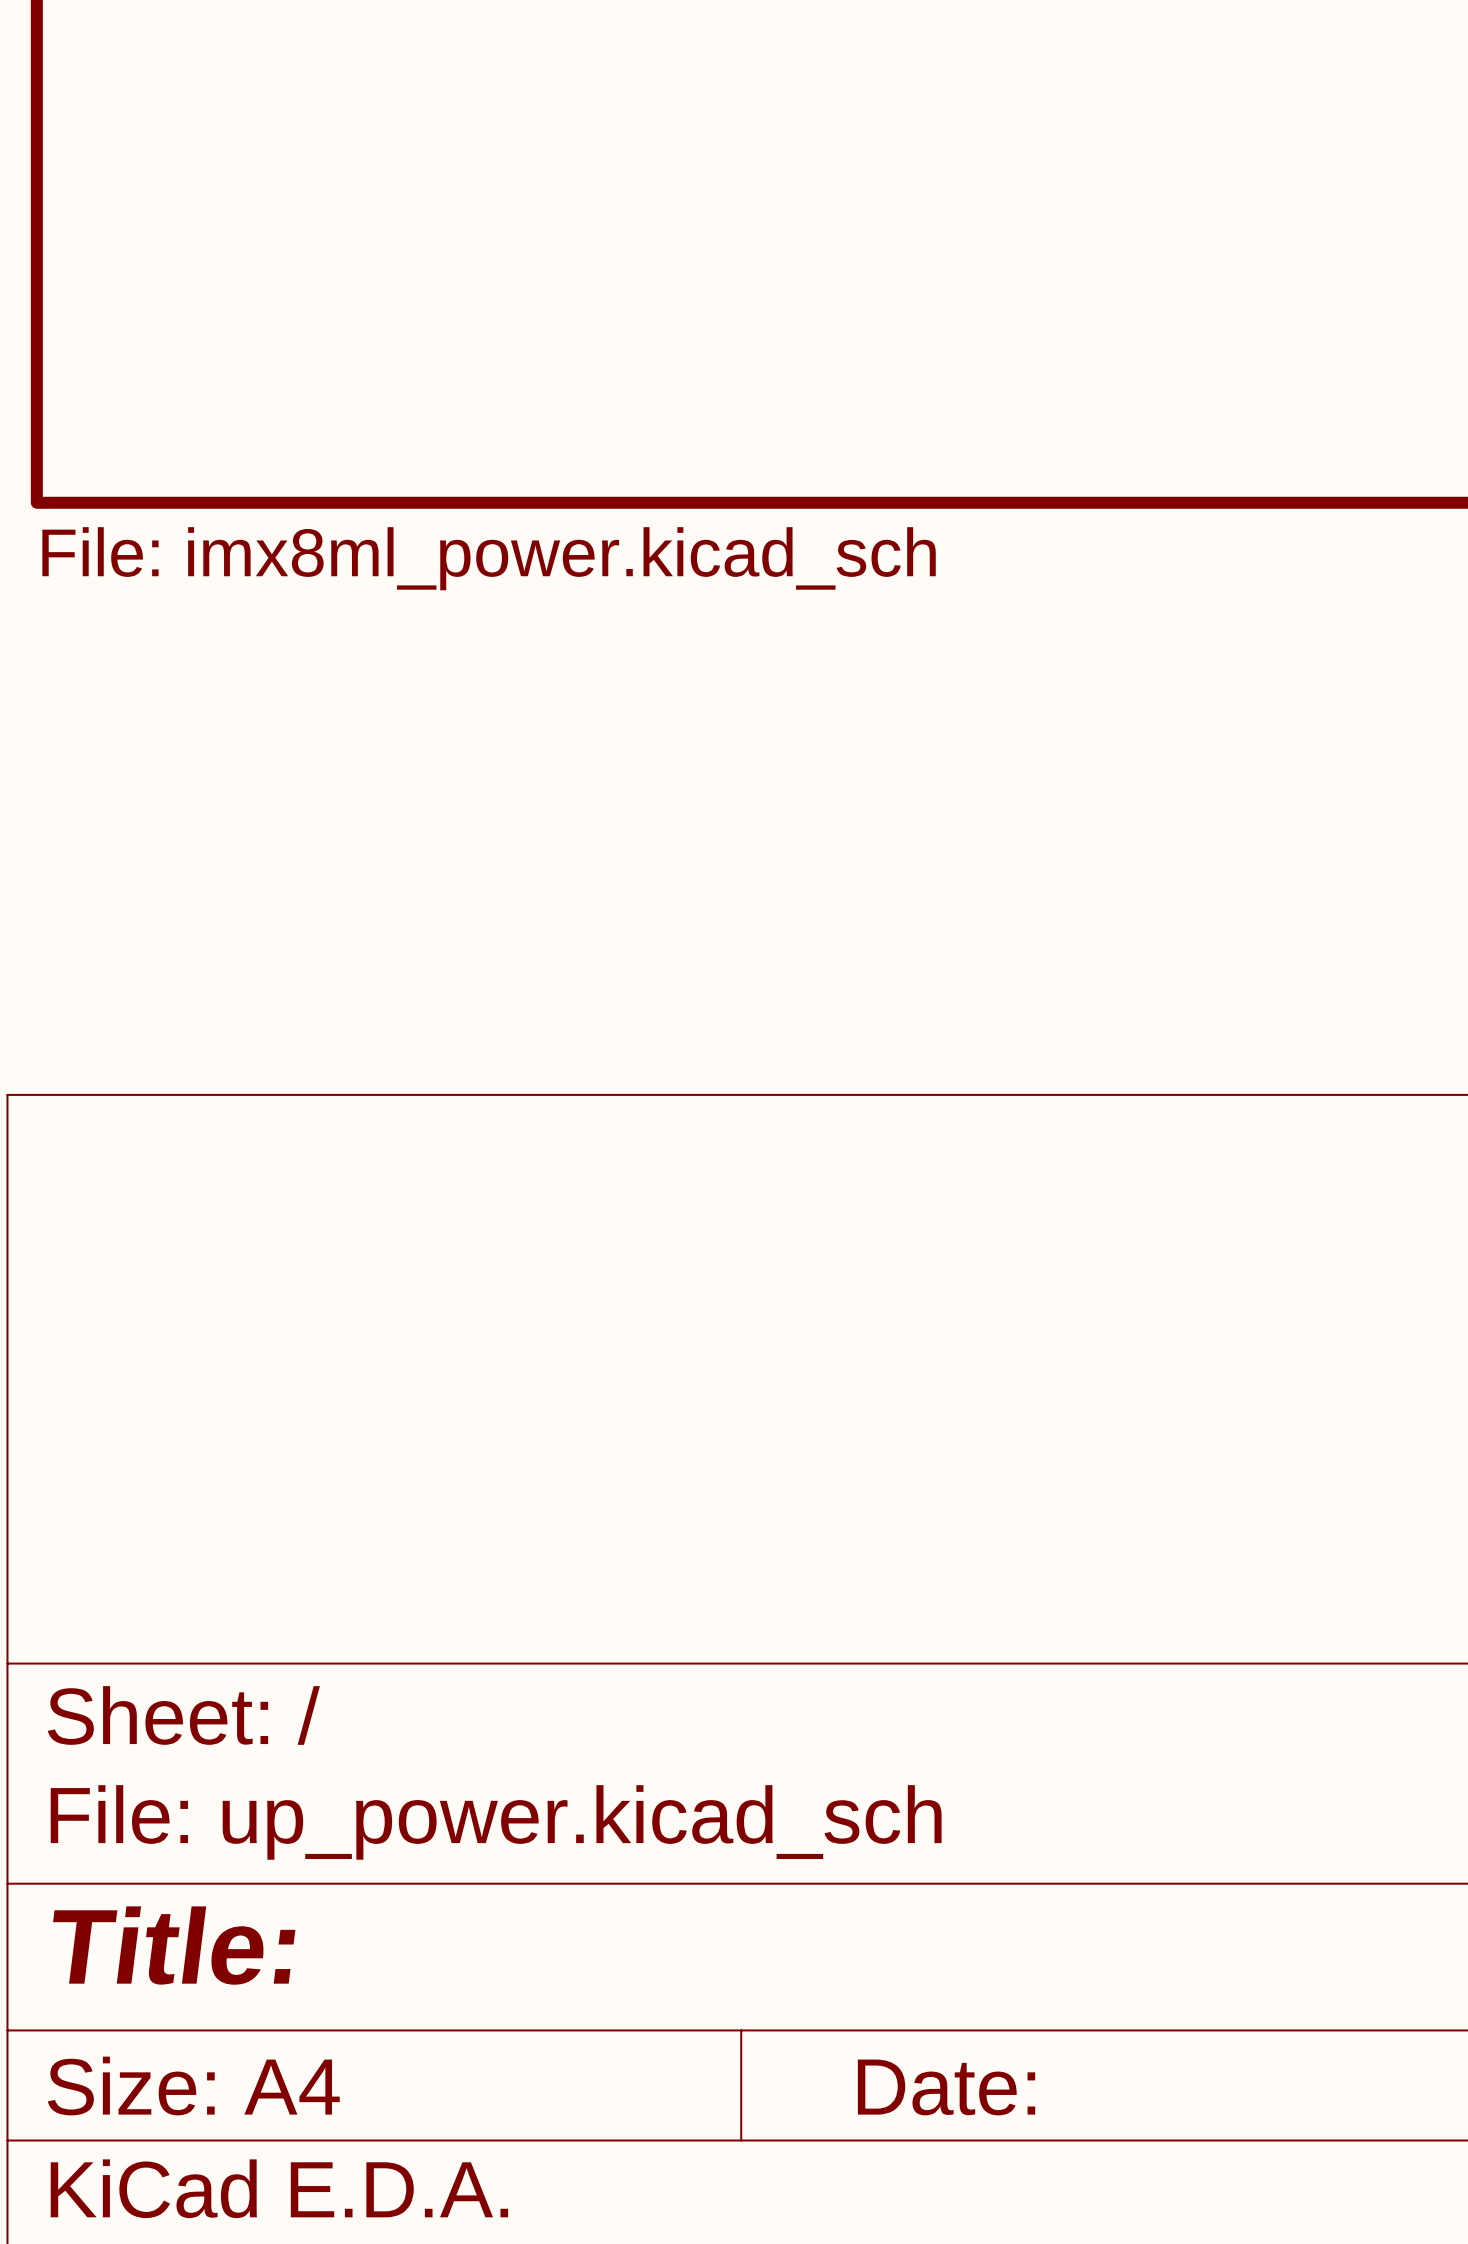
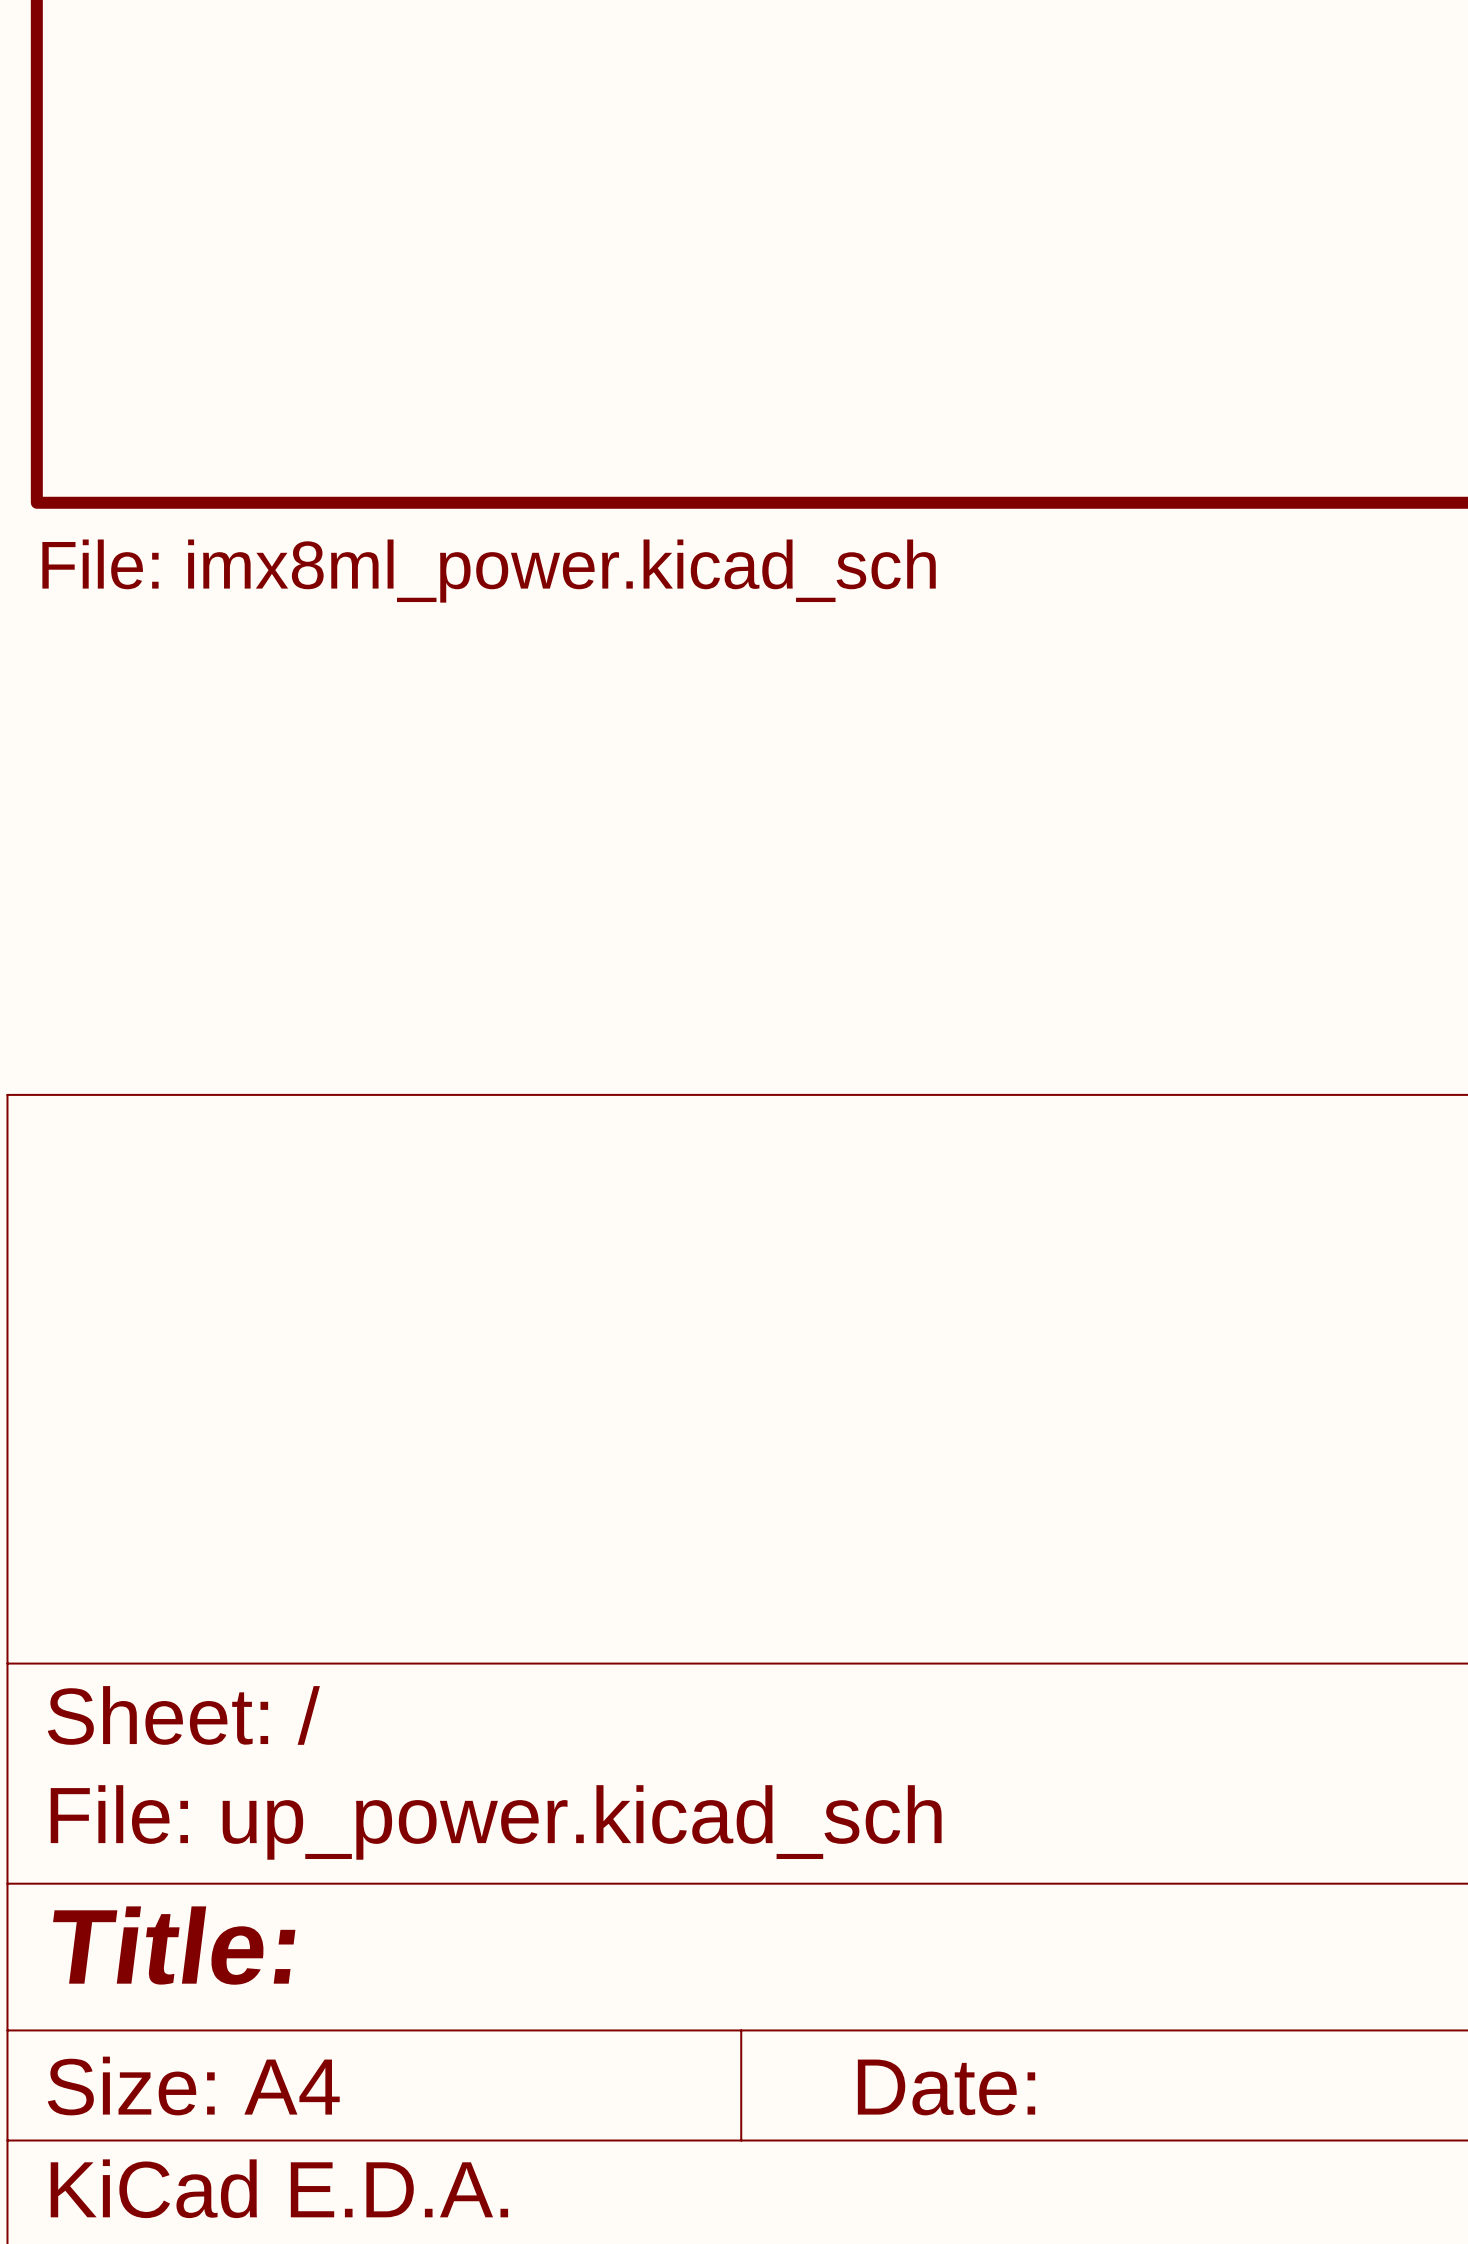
sheet value position: File: imx8ml_power.kicad_sch (489, 558) -> File: imx8ml_power.kicad_sch (489, 571)

